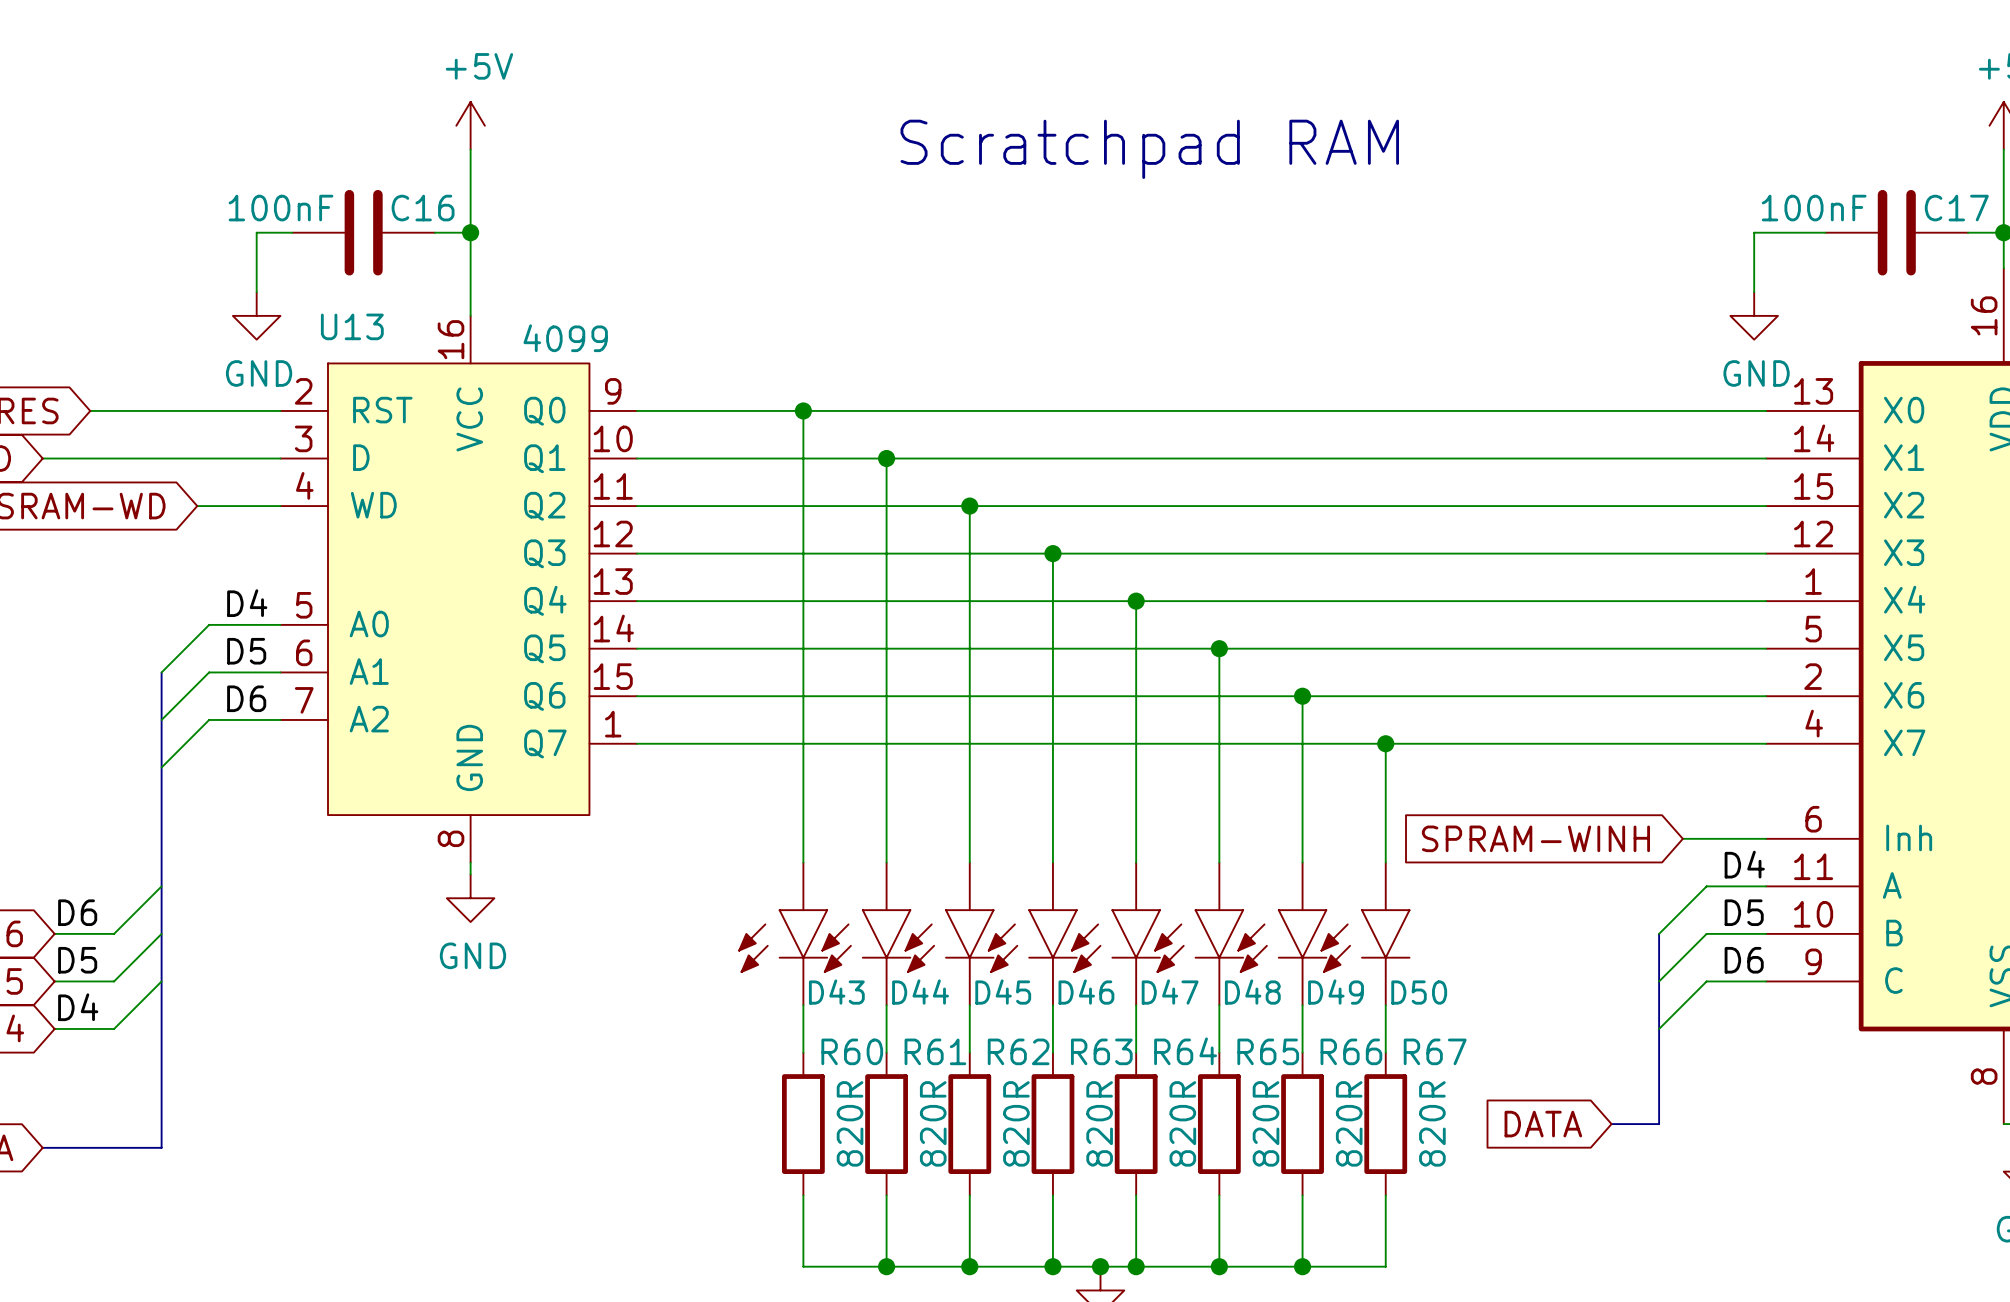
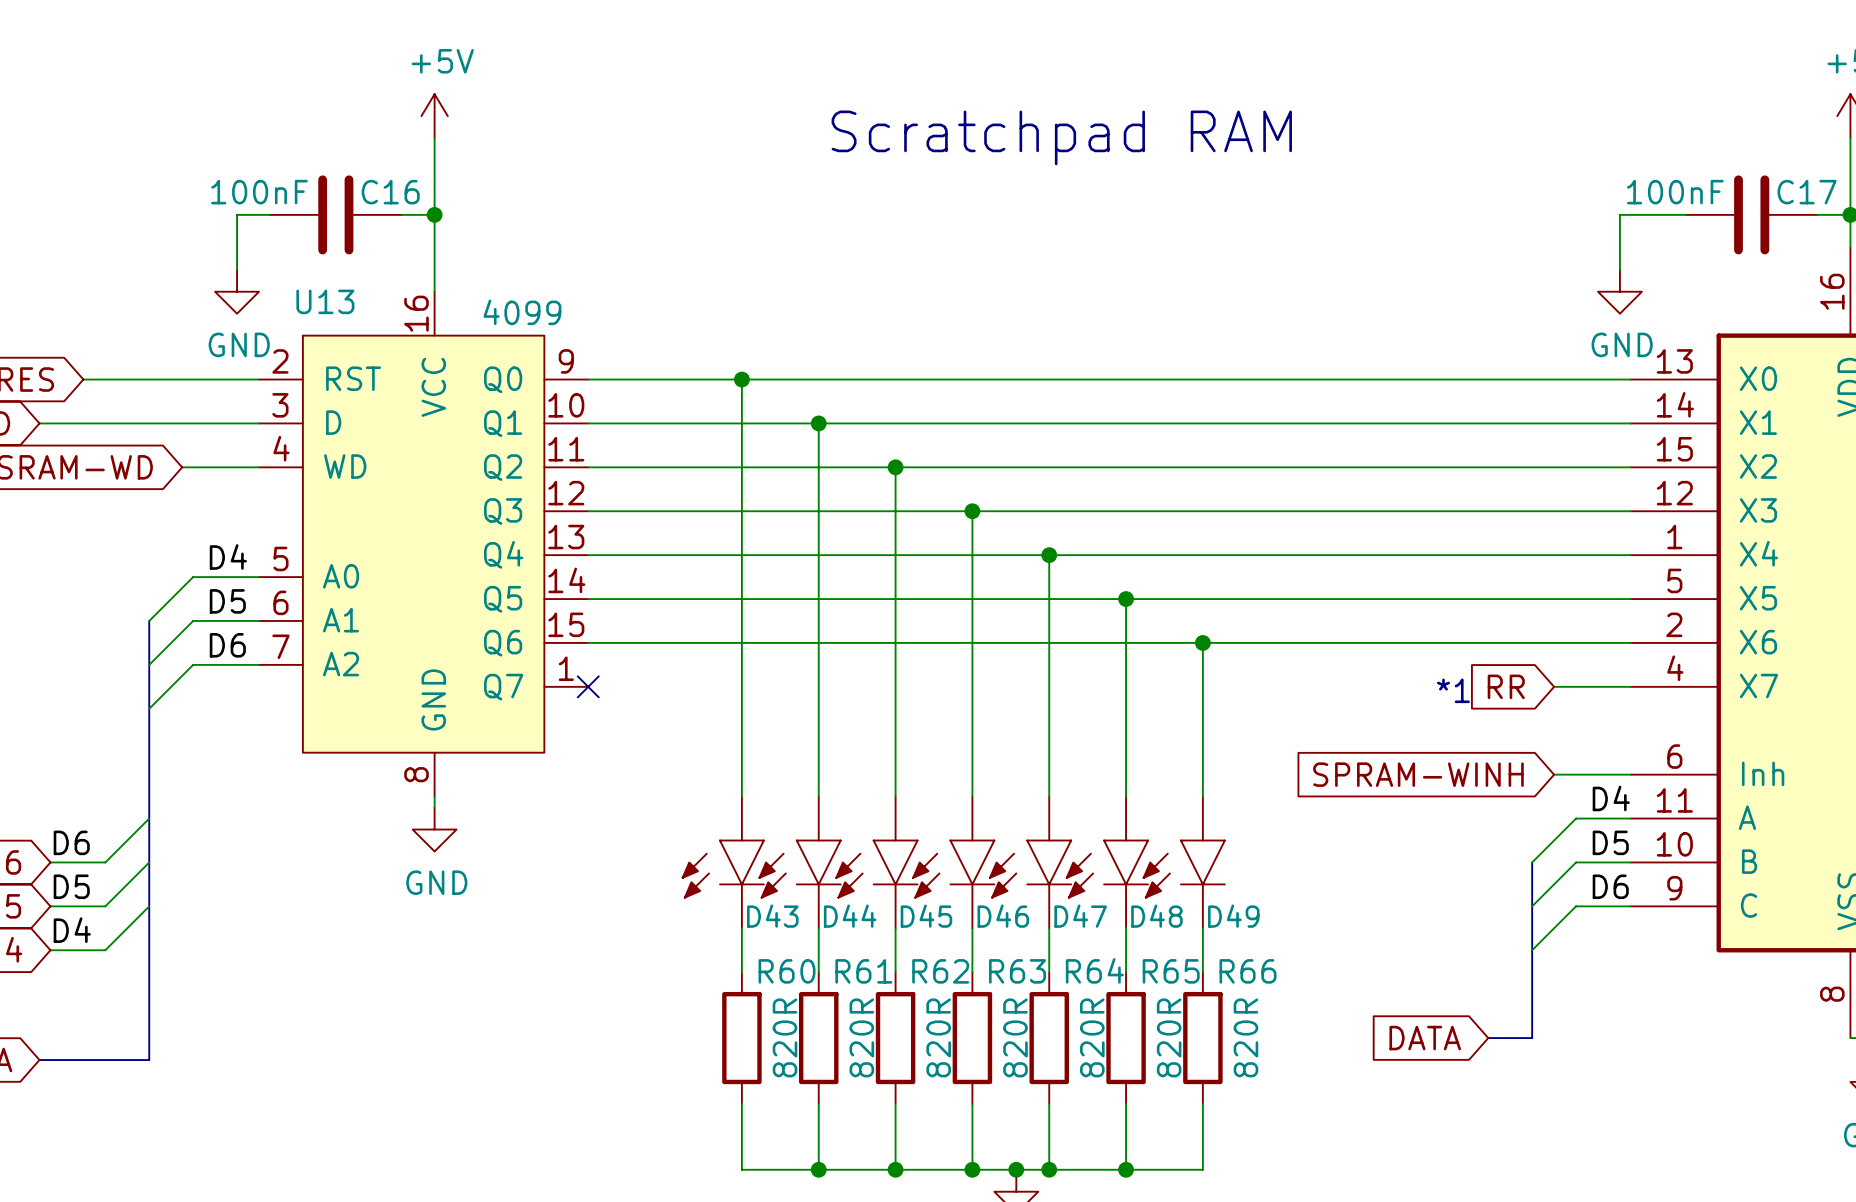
wire: (637, 743) (1682, 743) -> none
no-connect mark: none -> (588, 686)
wire: (1385, 743) (1385, 862) -> none
junction: (1385, 743) -> none
global label: none -> RR (1506, 686)
text: none -> *1 (1453, 690)
D50: (1365, 933) -> none
wire: (1385, 1005) (1385, 1052) -> none
R67: 820R (1385, 1124) -> none
wire: (1385, 1195) (1385, 1266) (1302, 1266) -> none
junction: (1302, 1266) -> none

